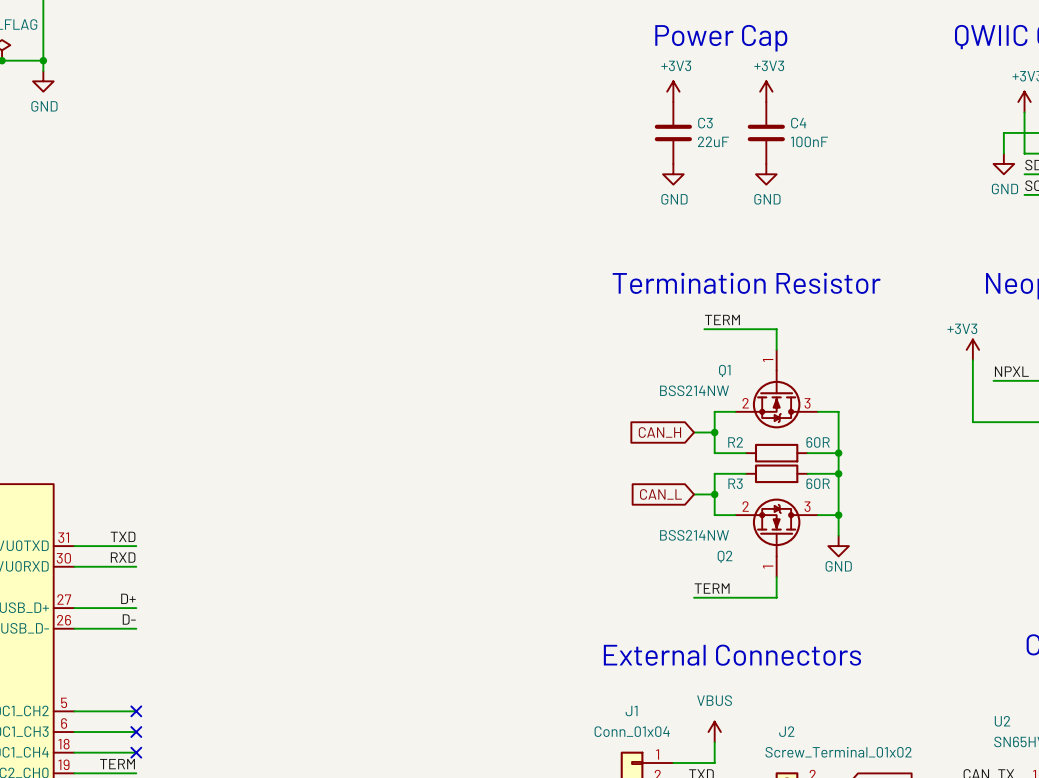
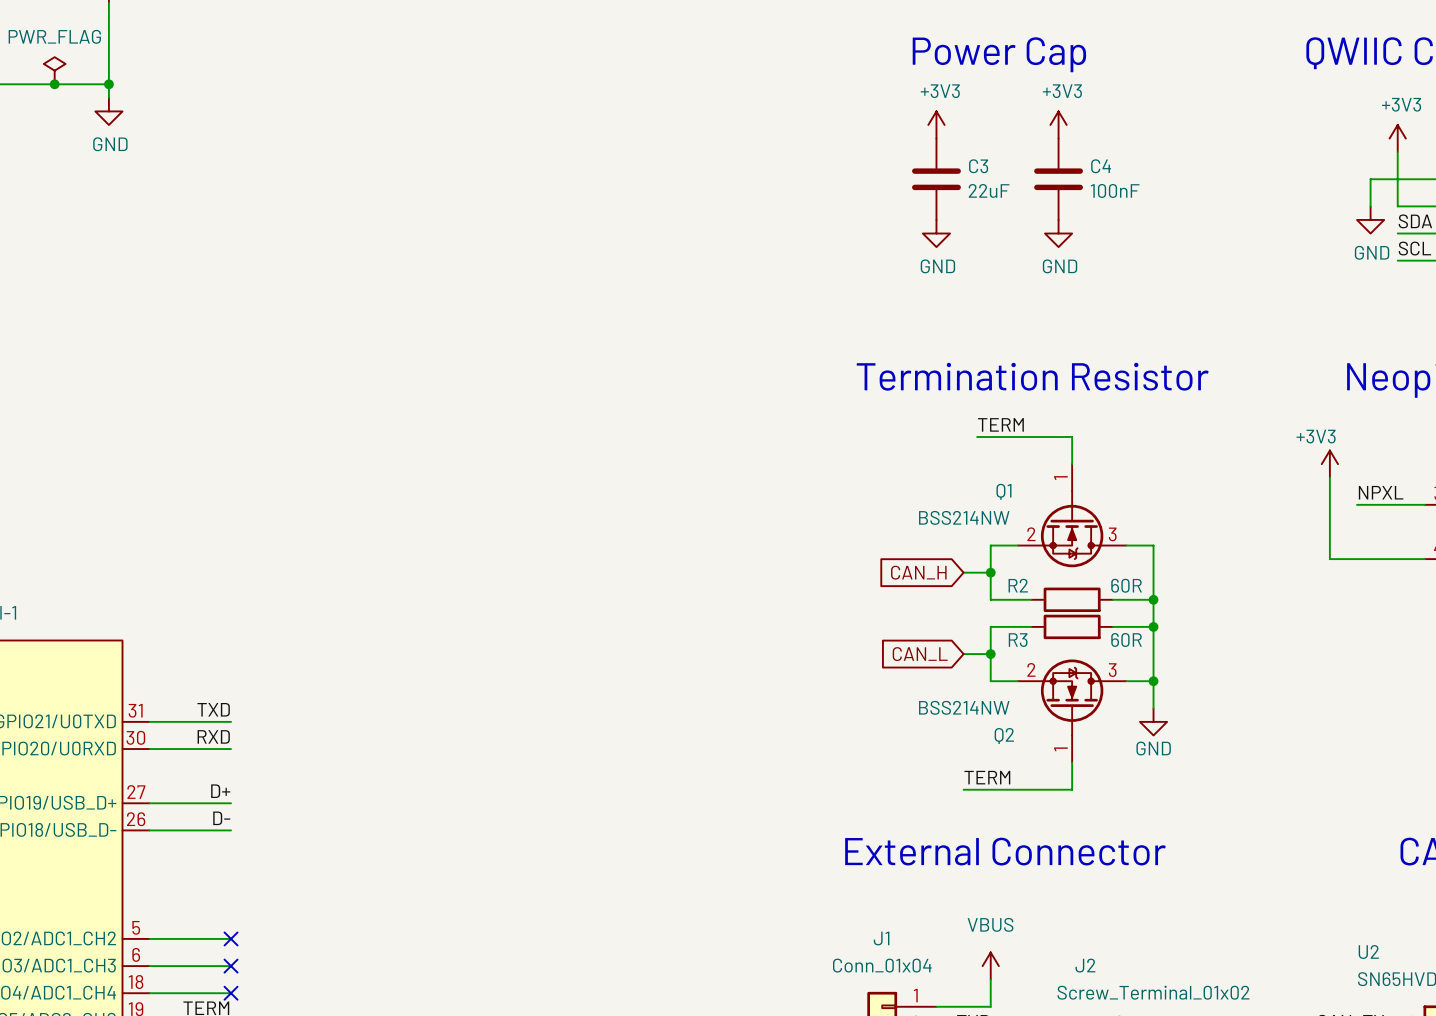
text: External Connectors (732, 655) -> External Connector (1005, 851)

